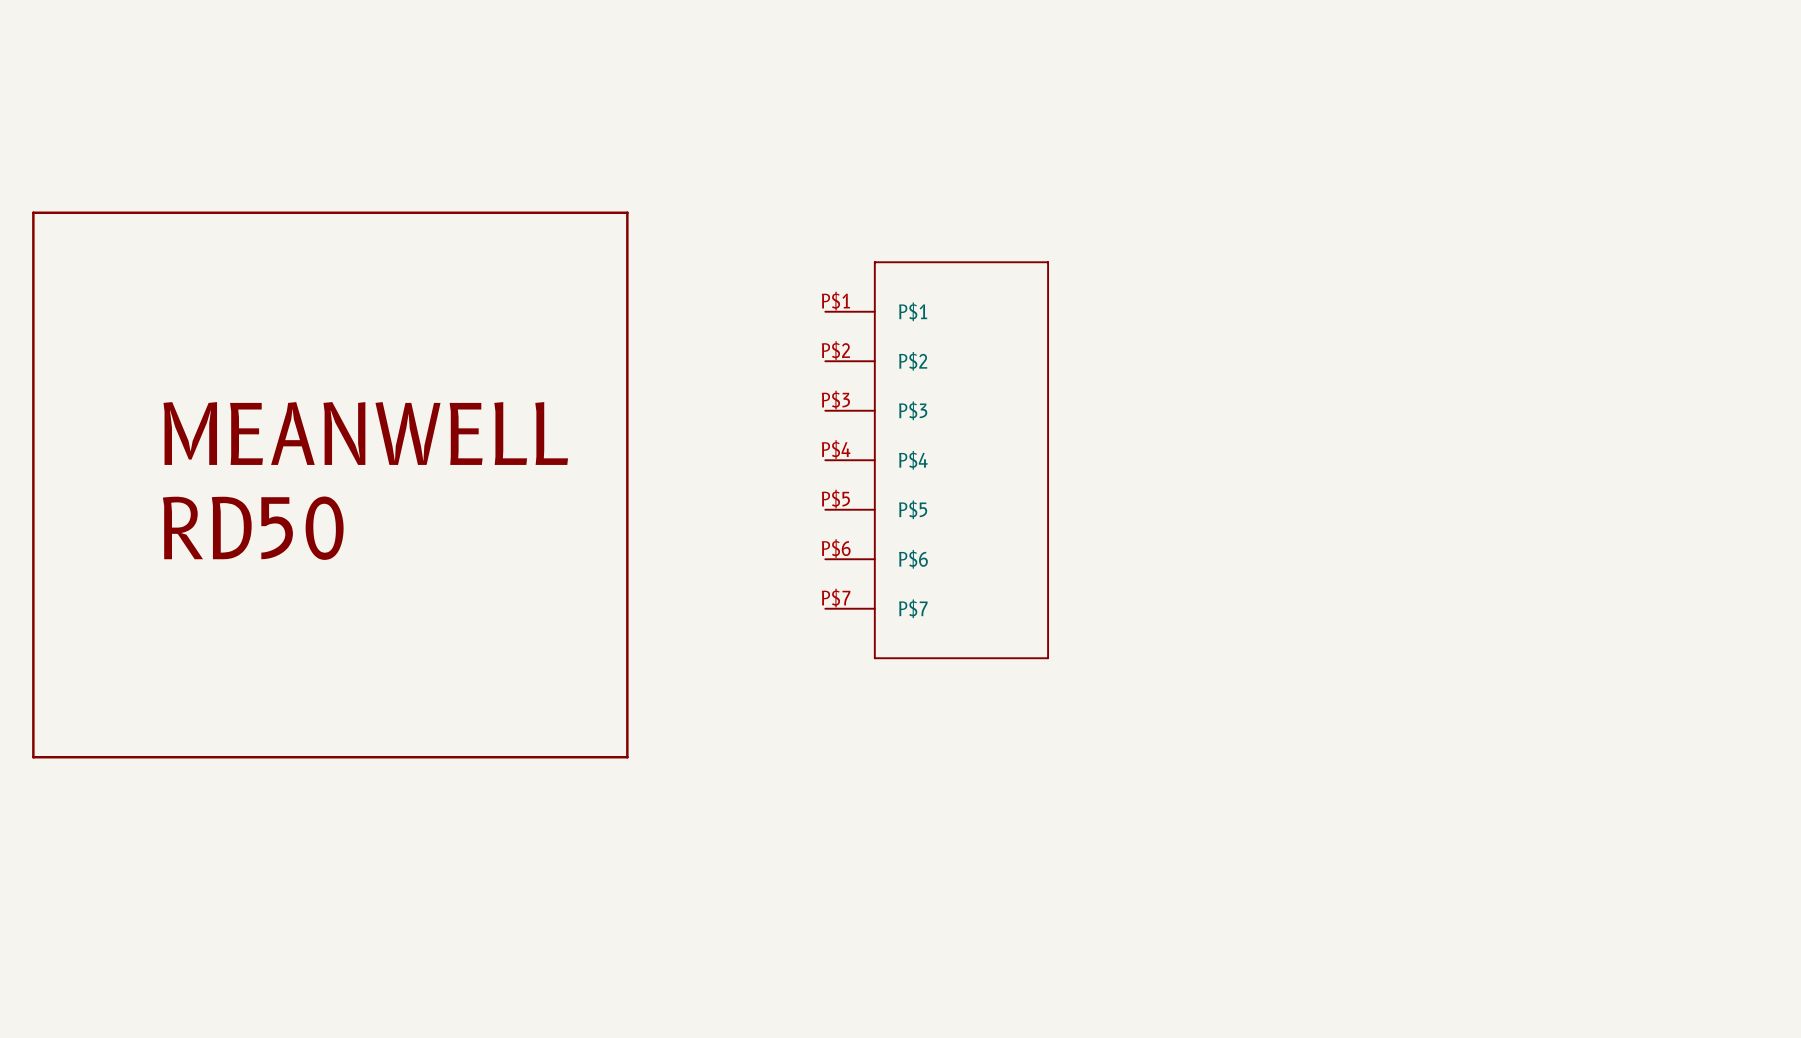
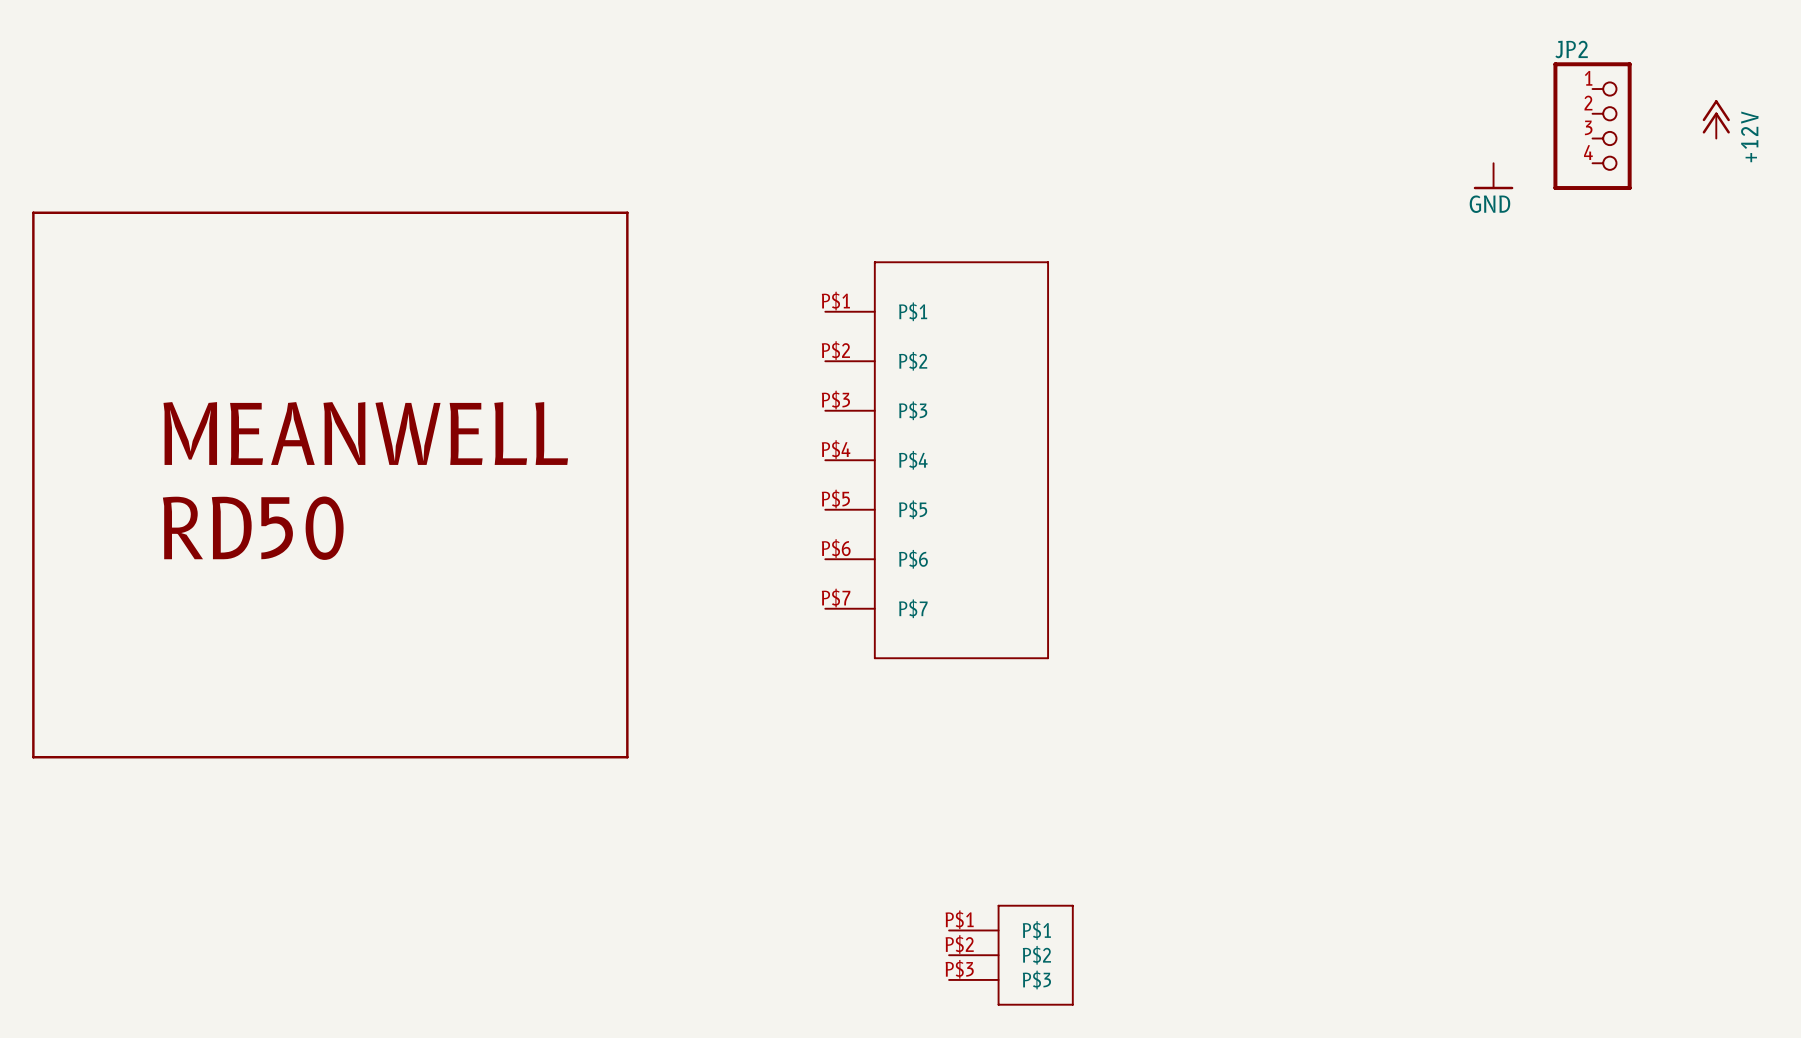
power symbol: none -> +12V (1716, 119)
JP2: none -> (1592, 126)
power symbol: none -> GND (1493, 176)
part: none -> (1011, 955)

